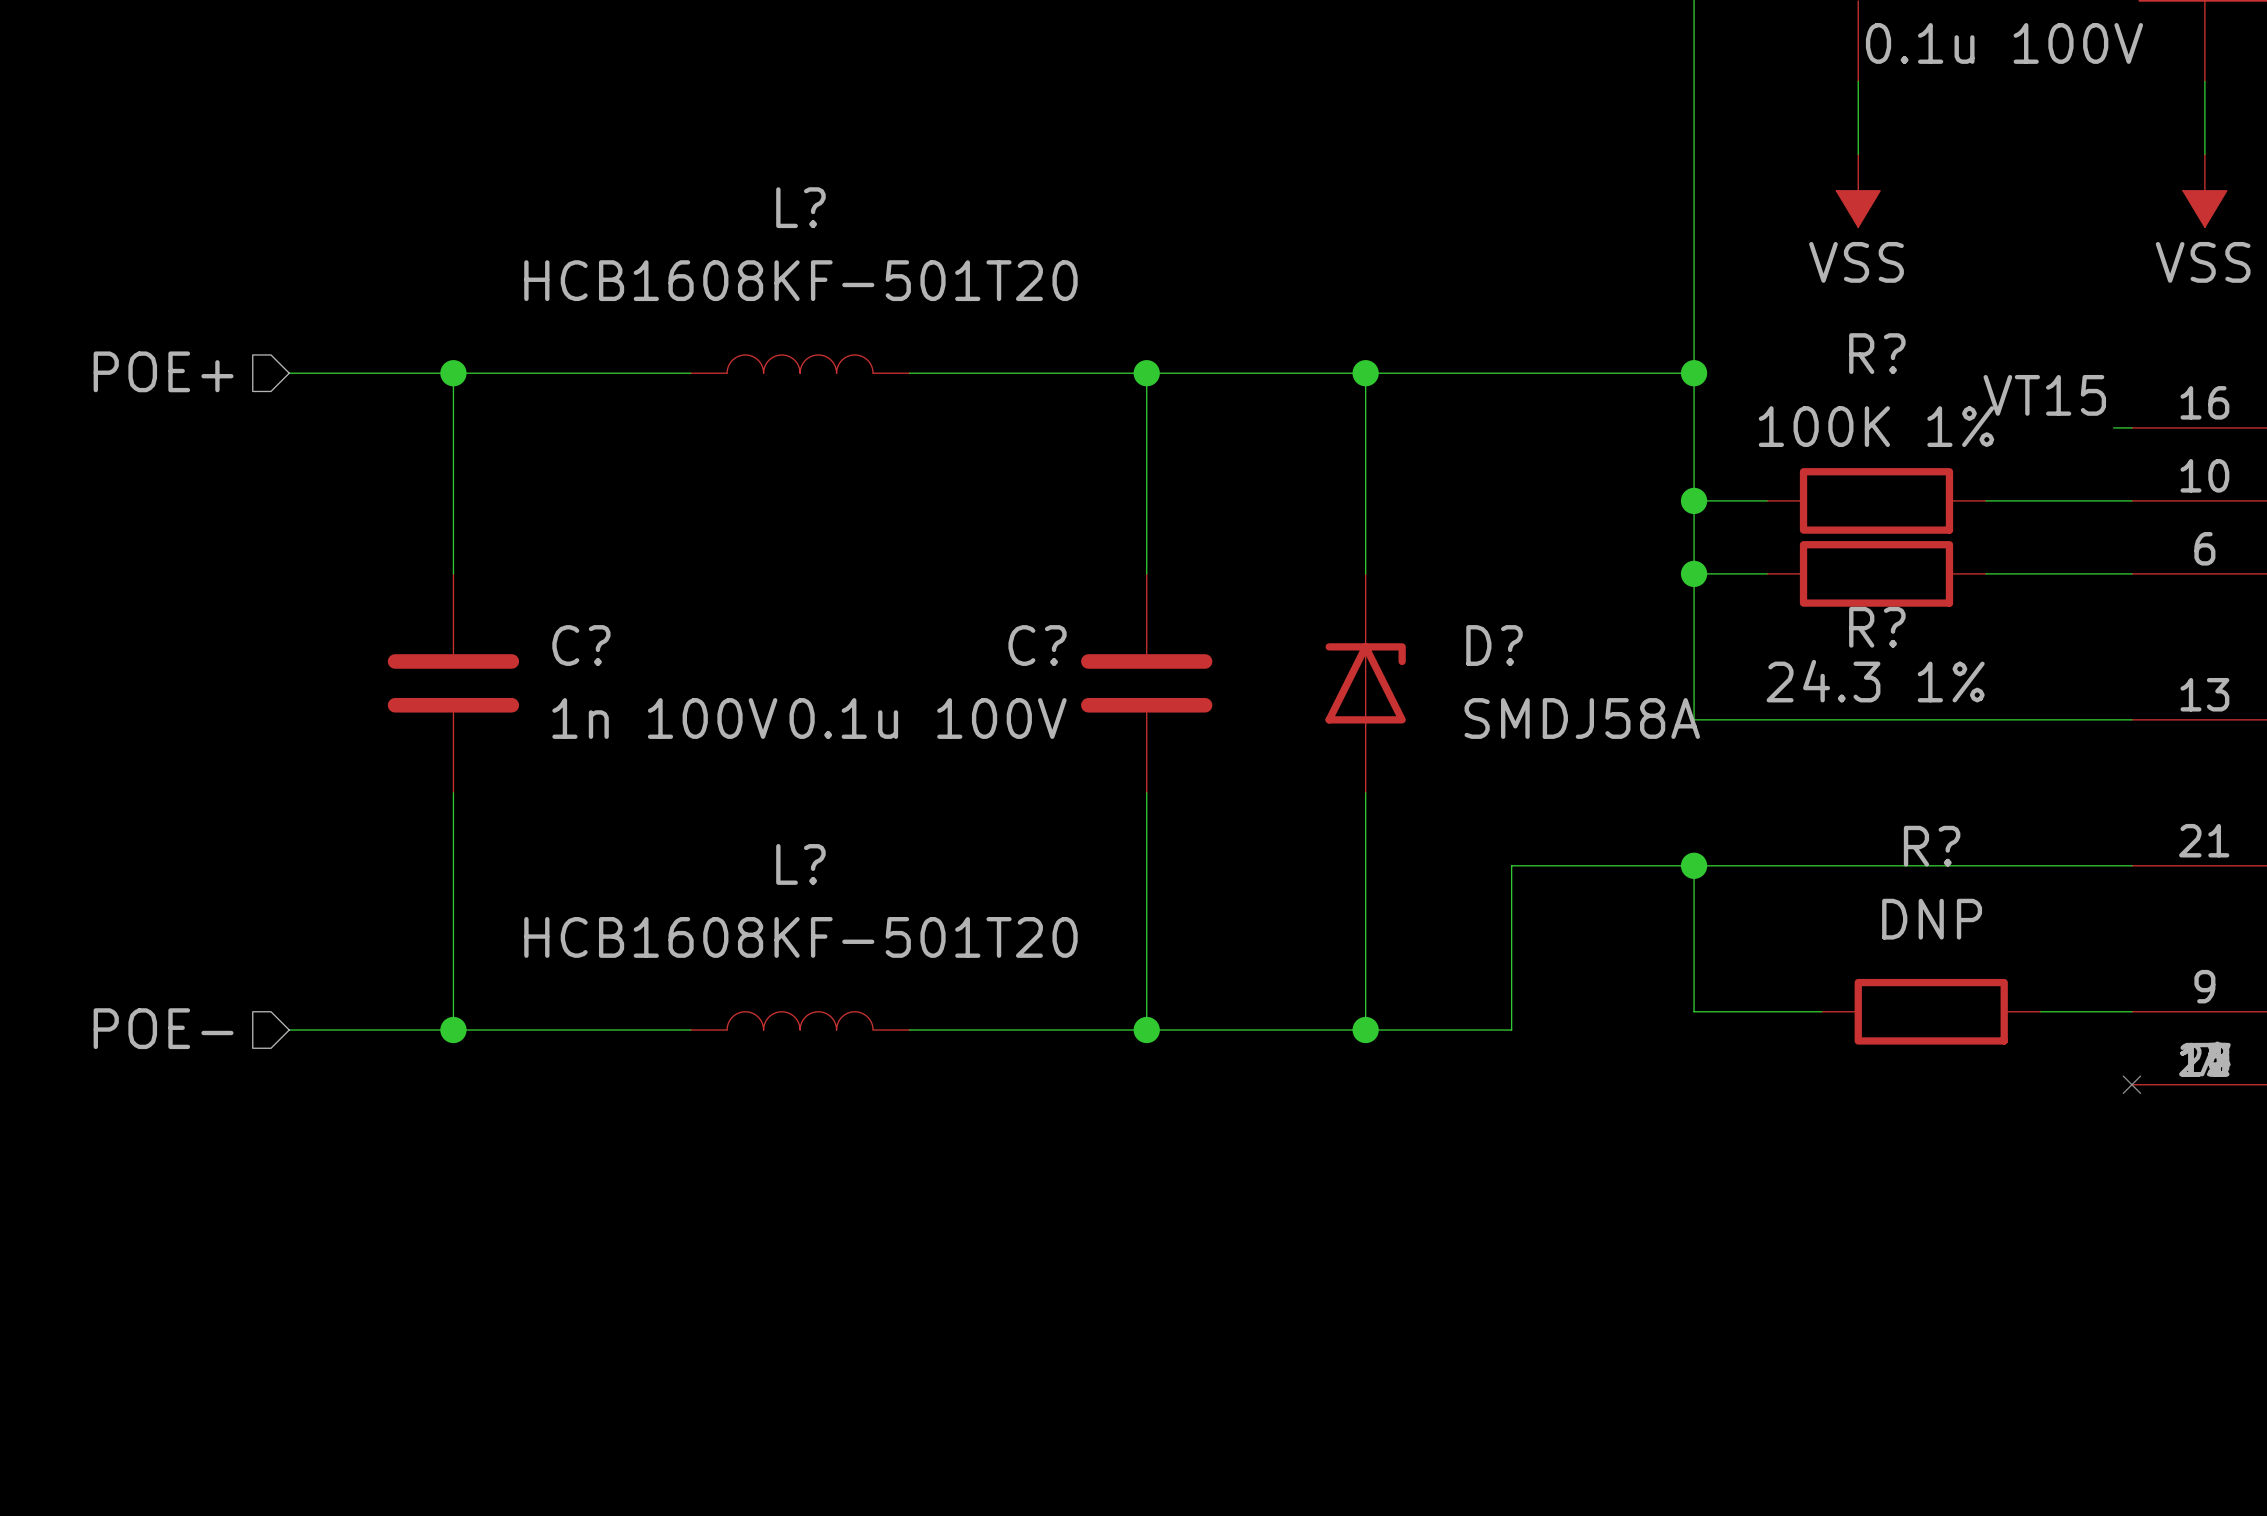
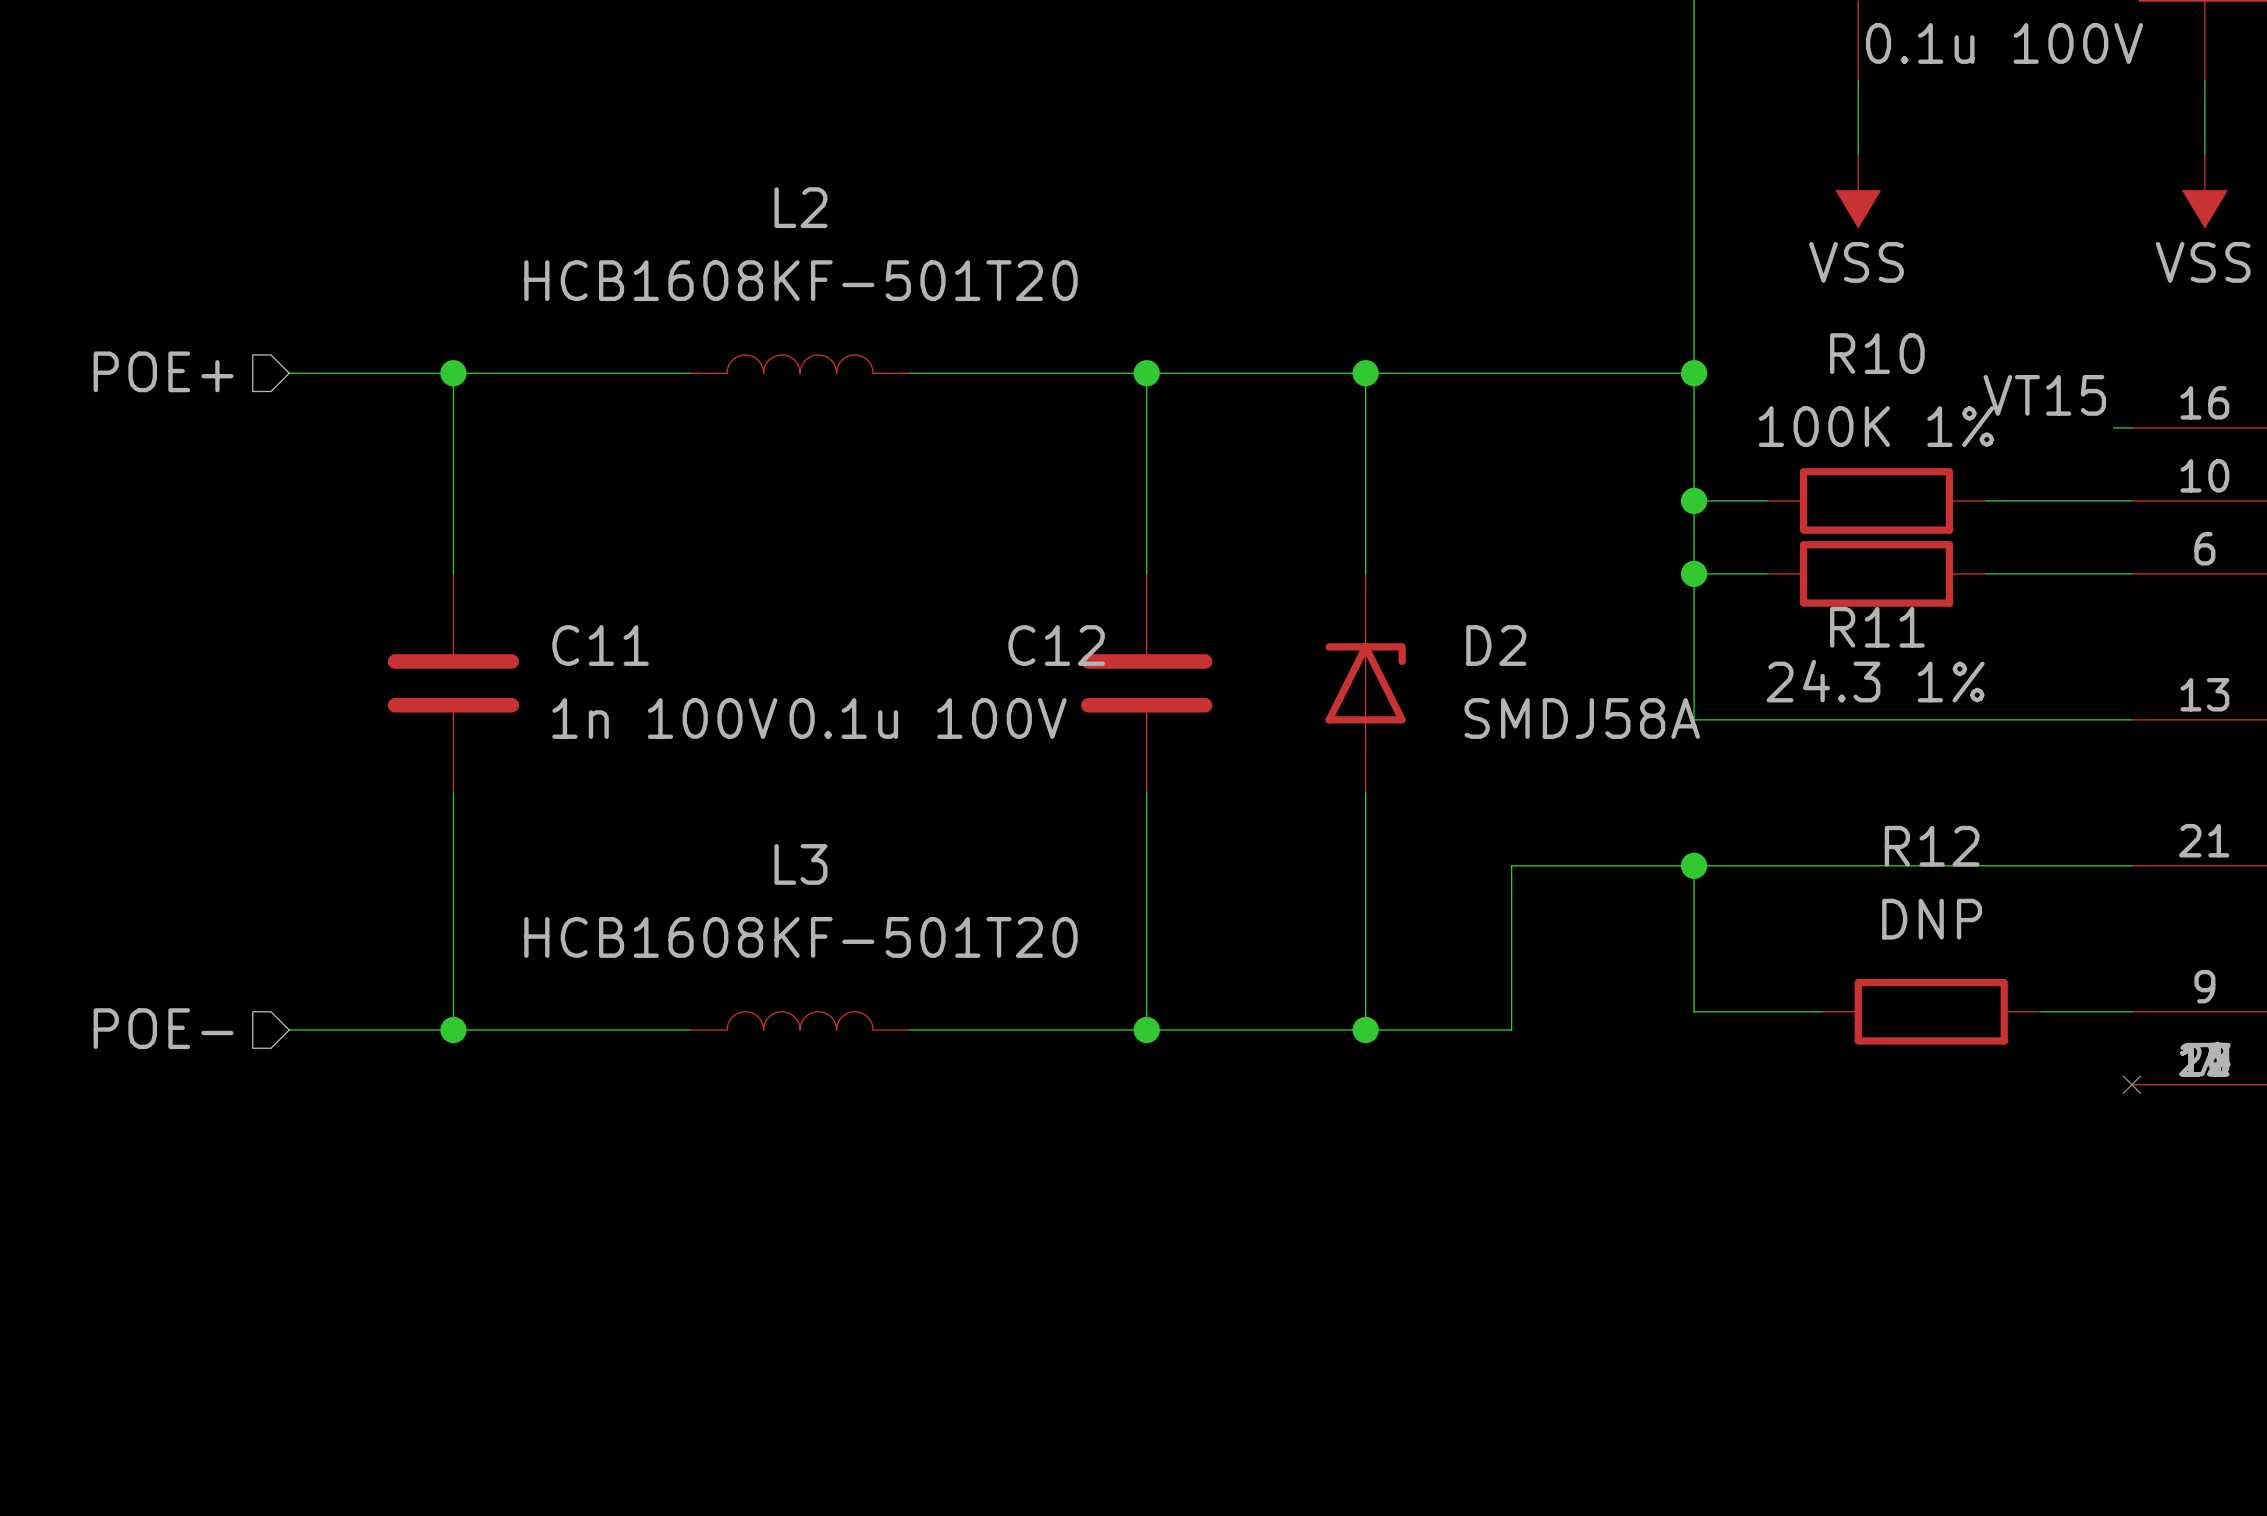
L? name: L? (800, 207) -> L2 (800, 207)
R? name: R? (1877, 353) -> R10 (1877, 353)
R? name: R? (1877, 627) -> R11 (1877, 627)
C? name: C? (581, 645) -> C11 (600, 645)
C? name: C? (1037, 645) -> C12 (1056, 645)
D? name: D? (1494, 645) -> D2 (1496, 645)
R? name: R? (1932, 846) -> R12 (1932, 846)
L? name: L? (800, 864) -> L3 (800, 864)

